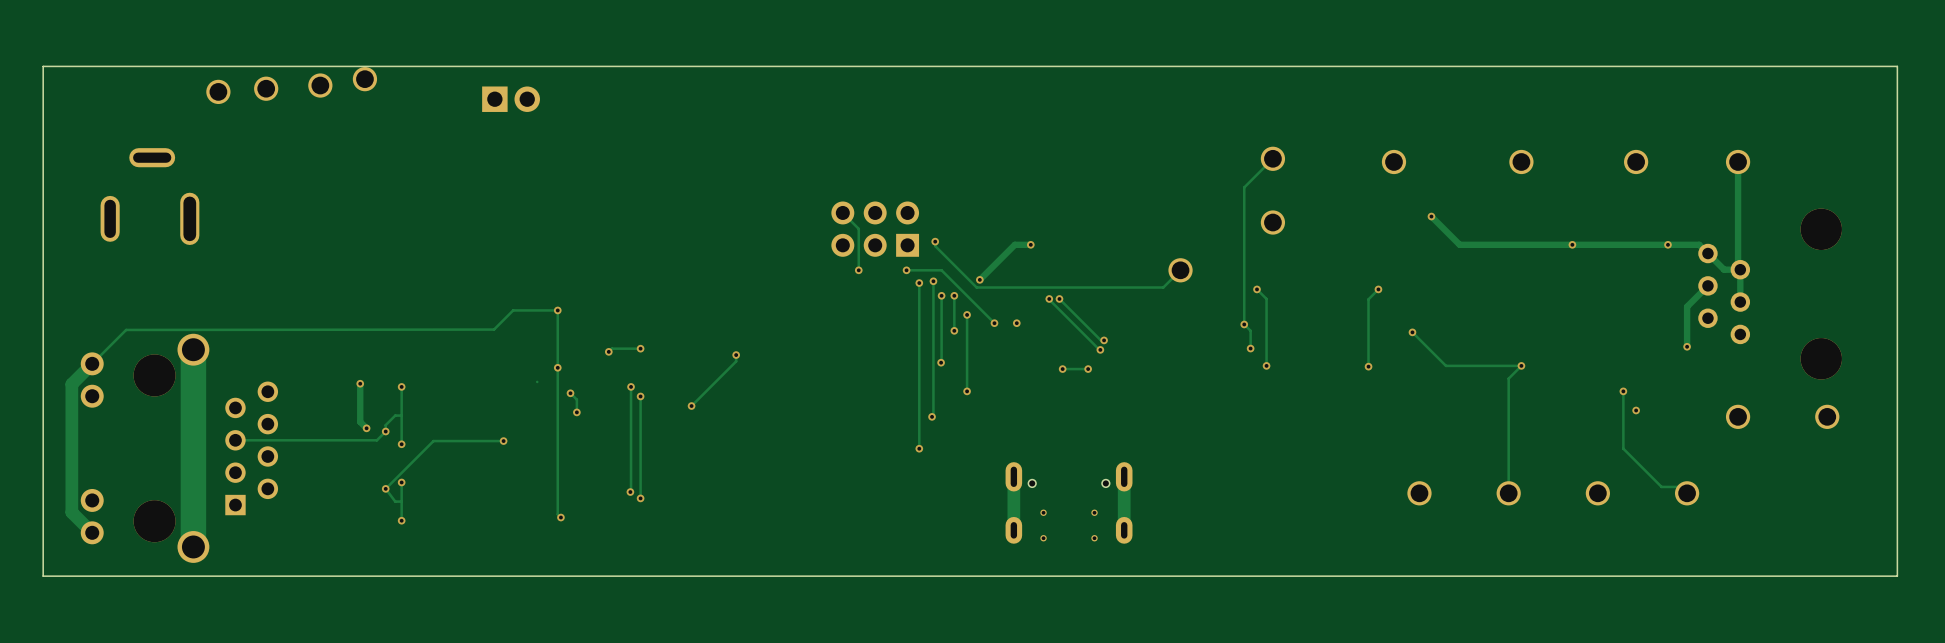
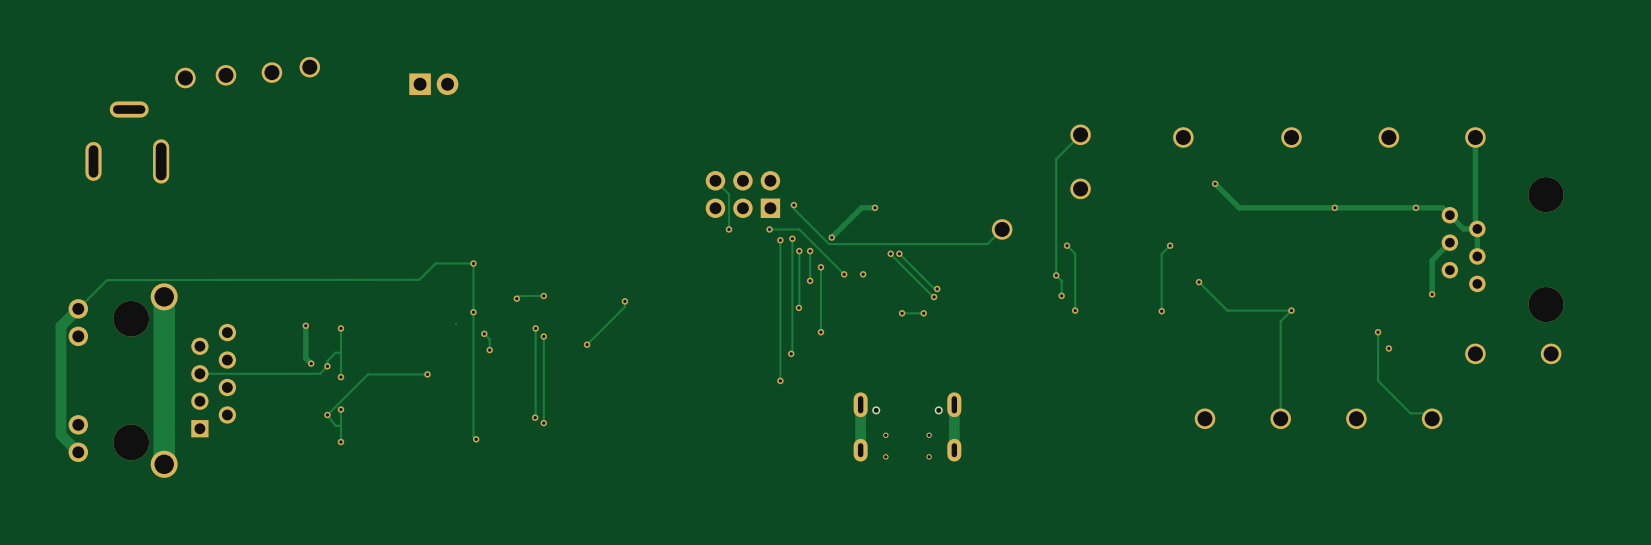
board edge: (1897, 66) (43, 66) (43, 576) (1897, 576) (1897, 66) -> none
part: none -> (127, 142)
part: (149, 196) -> none

